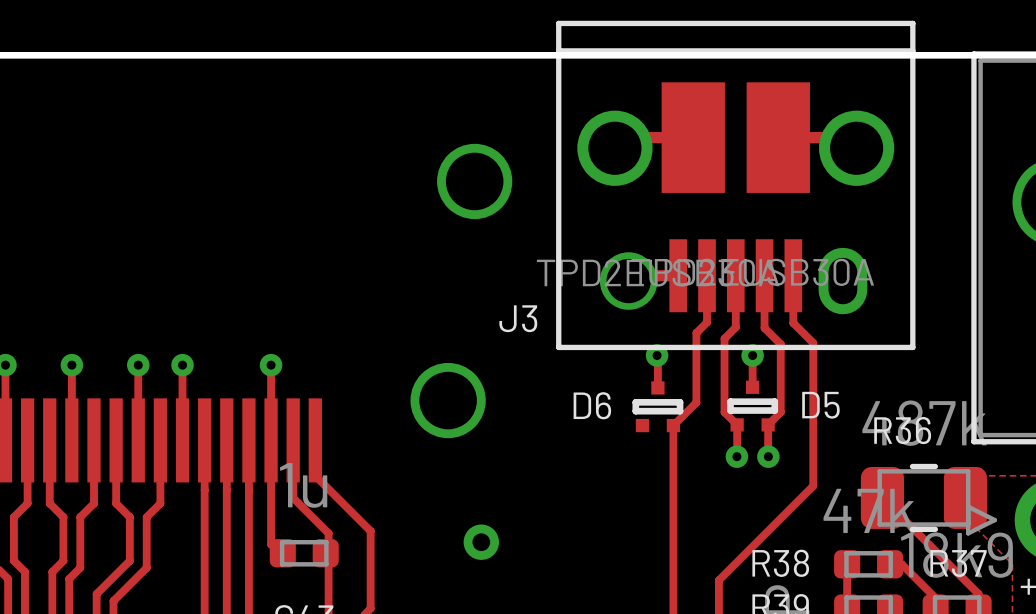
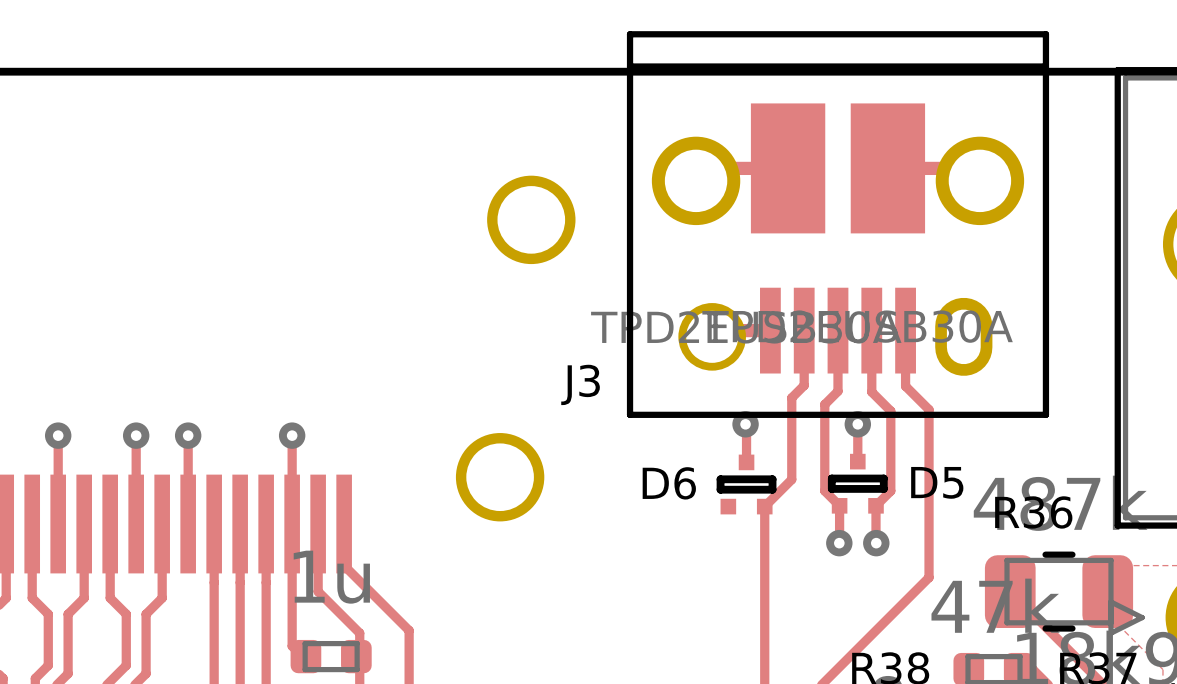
via: (481, 542) -> none

